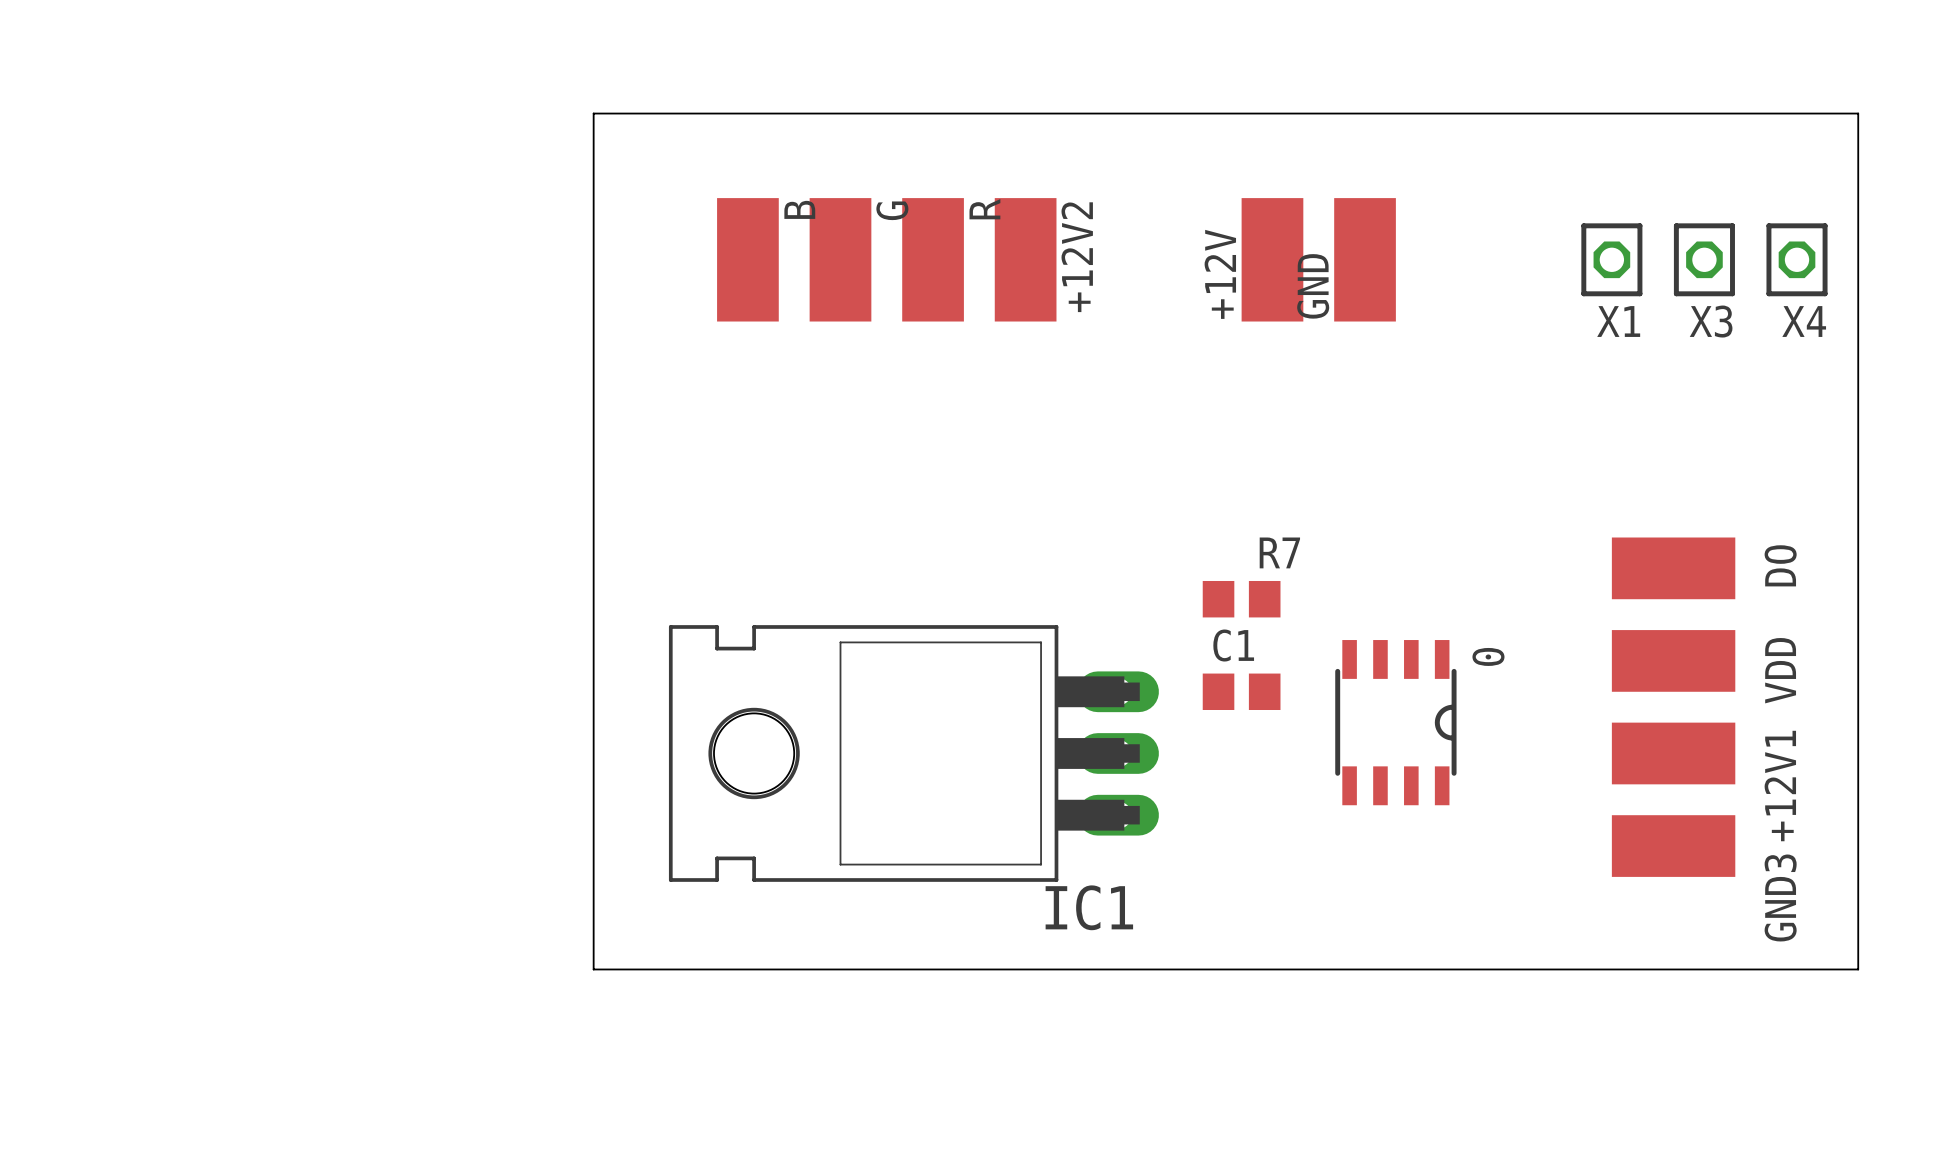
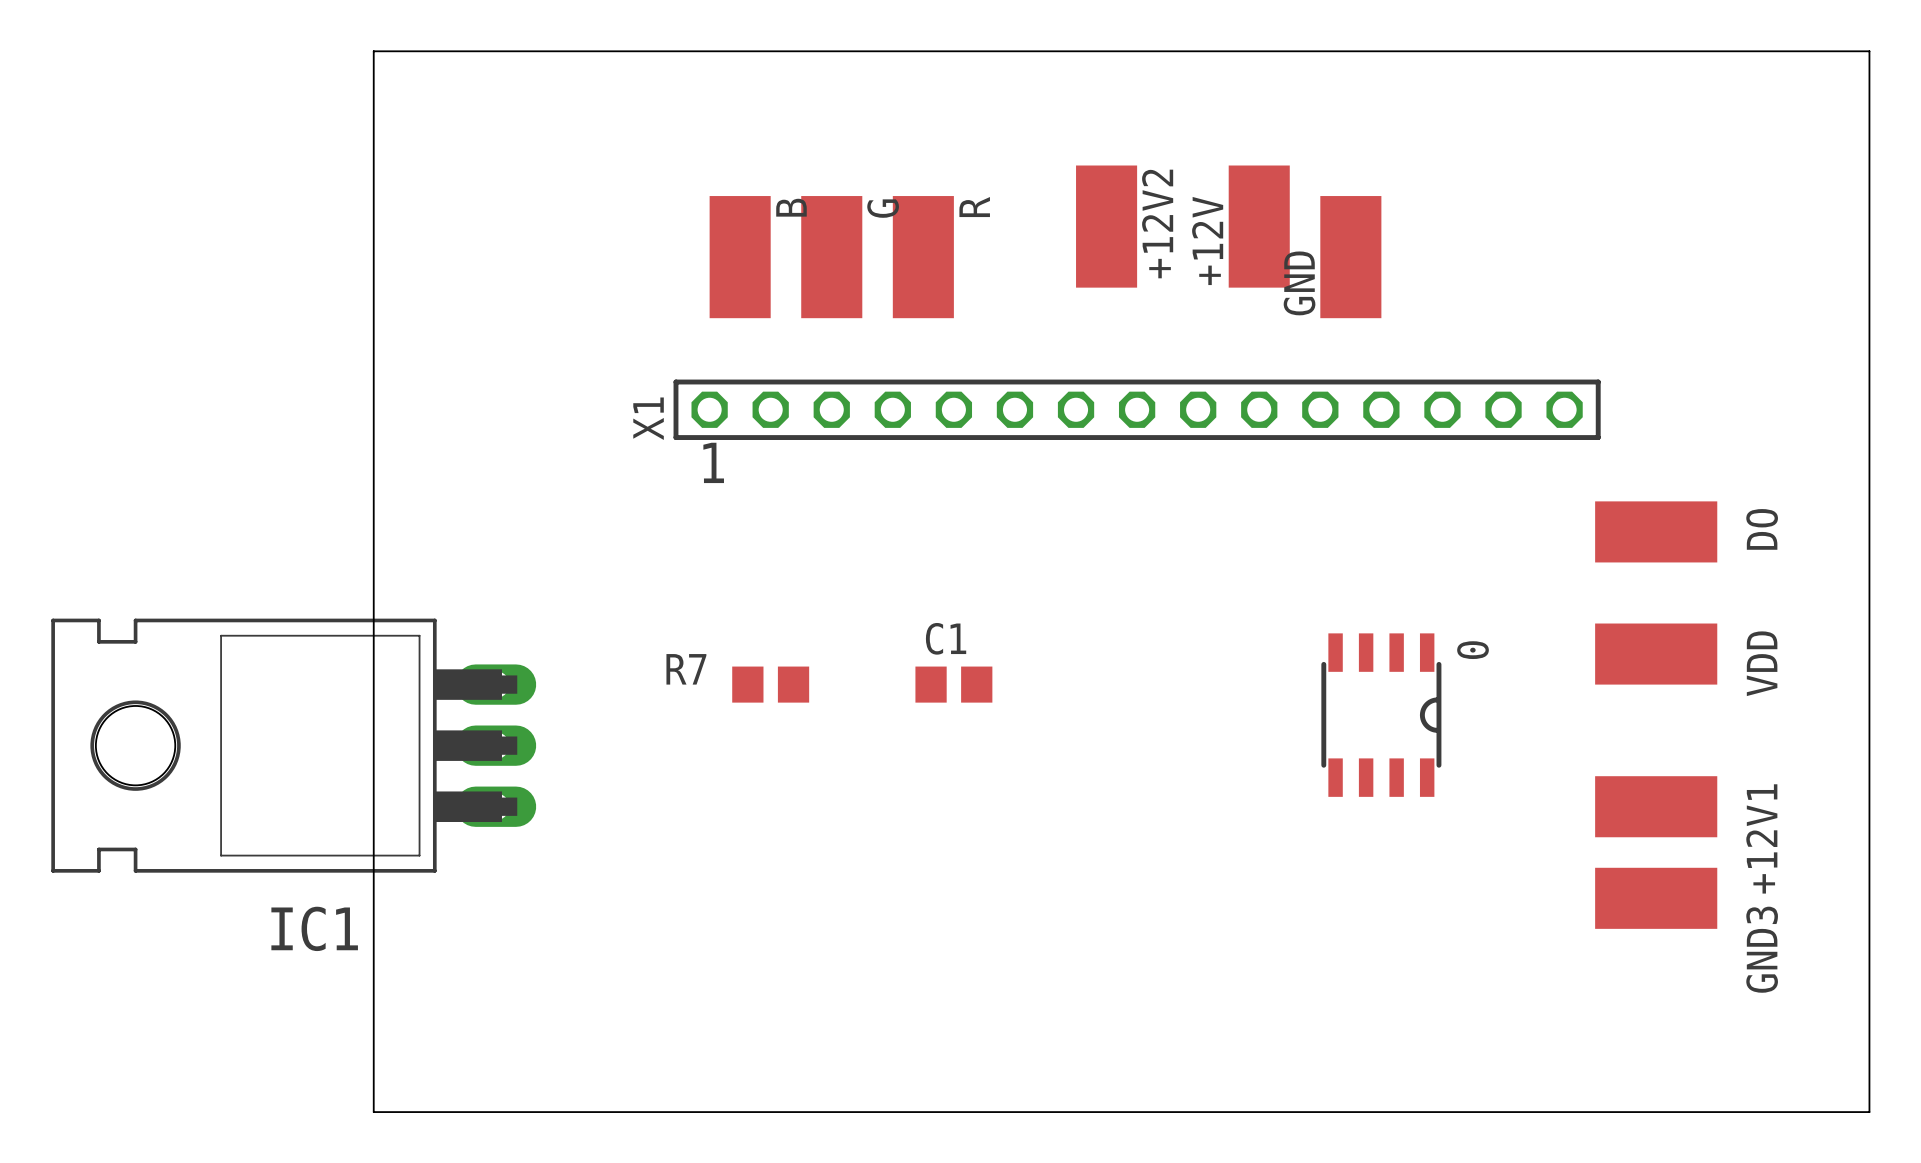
board edge: (593, 113) (1858, 113) (1858, 969) (593, 969) (593, 113) -> (373, 51) (373, 1112) (1869, 1112) (1869, 51) (373, 51)
X1 footprint: [1581, 223, 1643, 297] -> [673, 379, 1601, 440]
+12V2 position: (1025, 259) -> (1106, 226)
+12V position: (1272, 259) -> (1259, 226)
X3: (1704, 259) -> none
X4: (1797, 259) -> none
X1 name position: X1 (1618, 321) -> X1 (648, 418)
R7 name position: R7 (1279, 552) -> R7 (686, 669)
DO position: (1673, 568) -> (1656, 531)
R7 position: (1241, 599) -> (770, 684)
C1 position: (1241, 691) -> (953, 684)
IC1 position: (913, 753) -> (293, 745)
+12V1 position: (1673, 753) -> (1656, 806)
GND3 position: (1673, 846) -> (1656, 898)
IC1 name position: IC1 (1089, 907) -> IC1 (314, 928)

